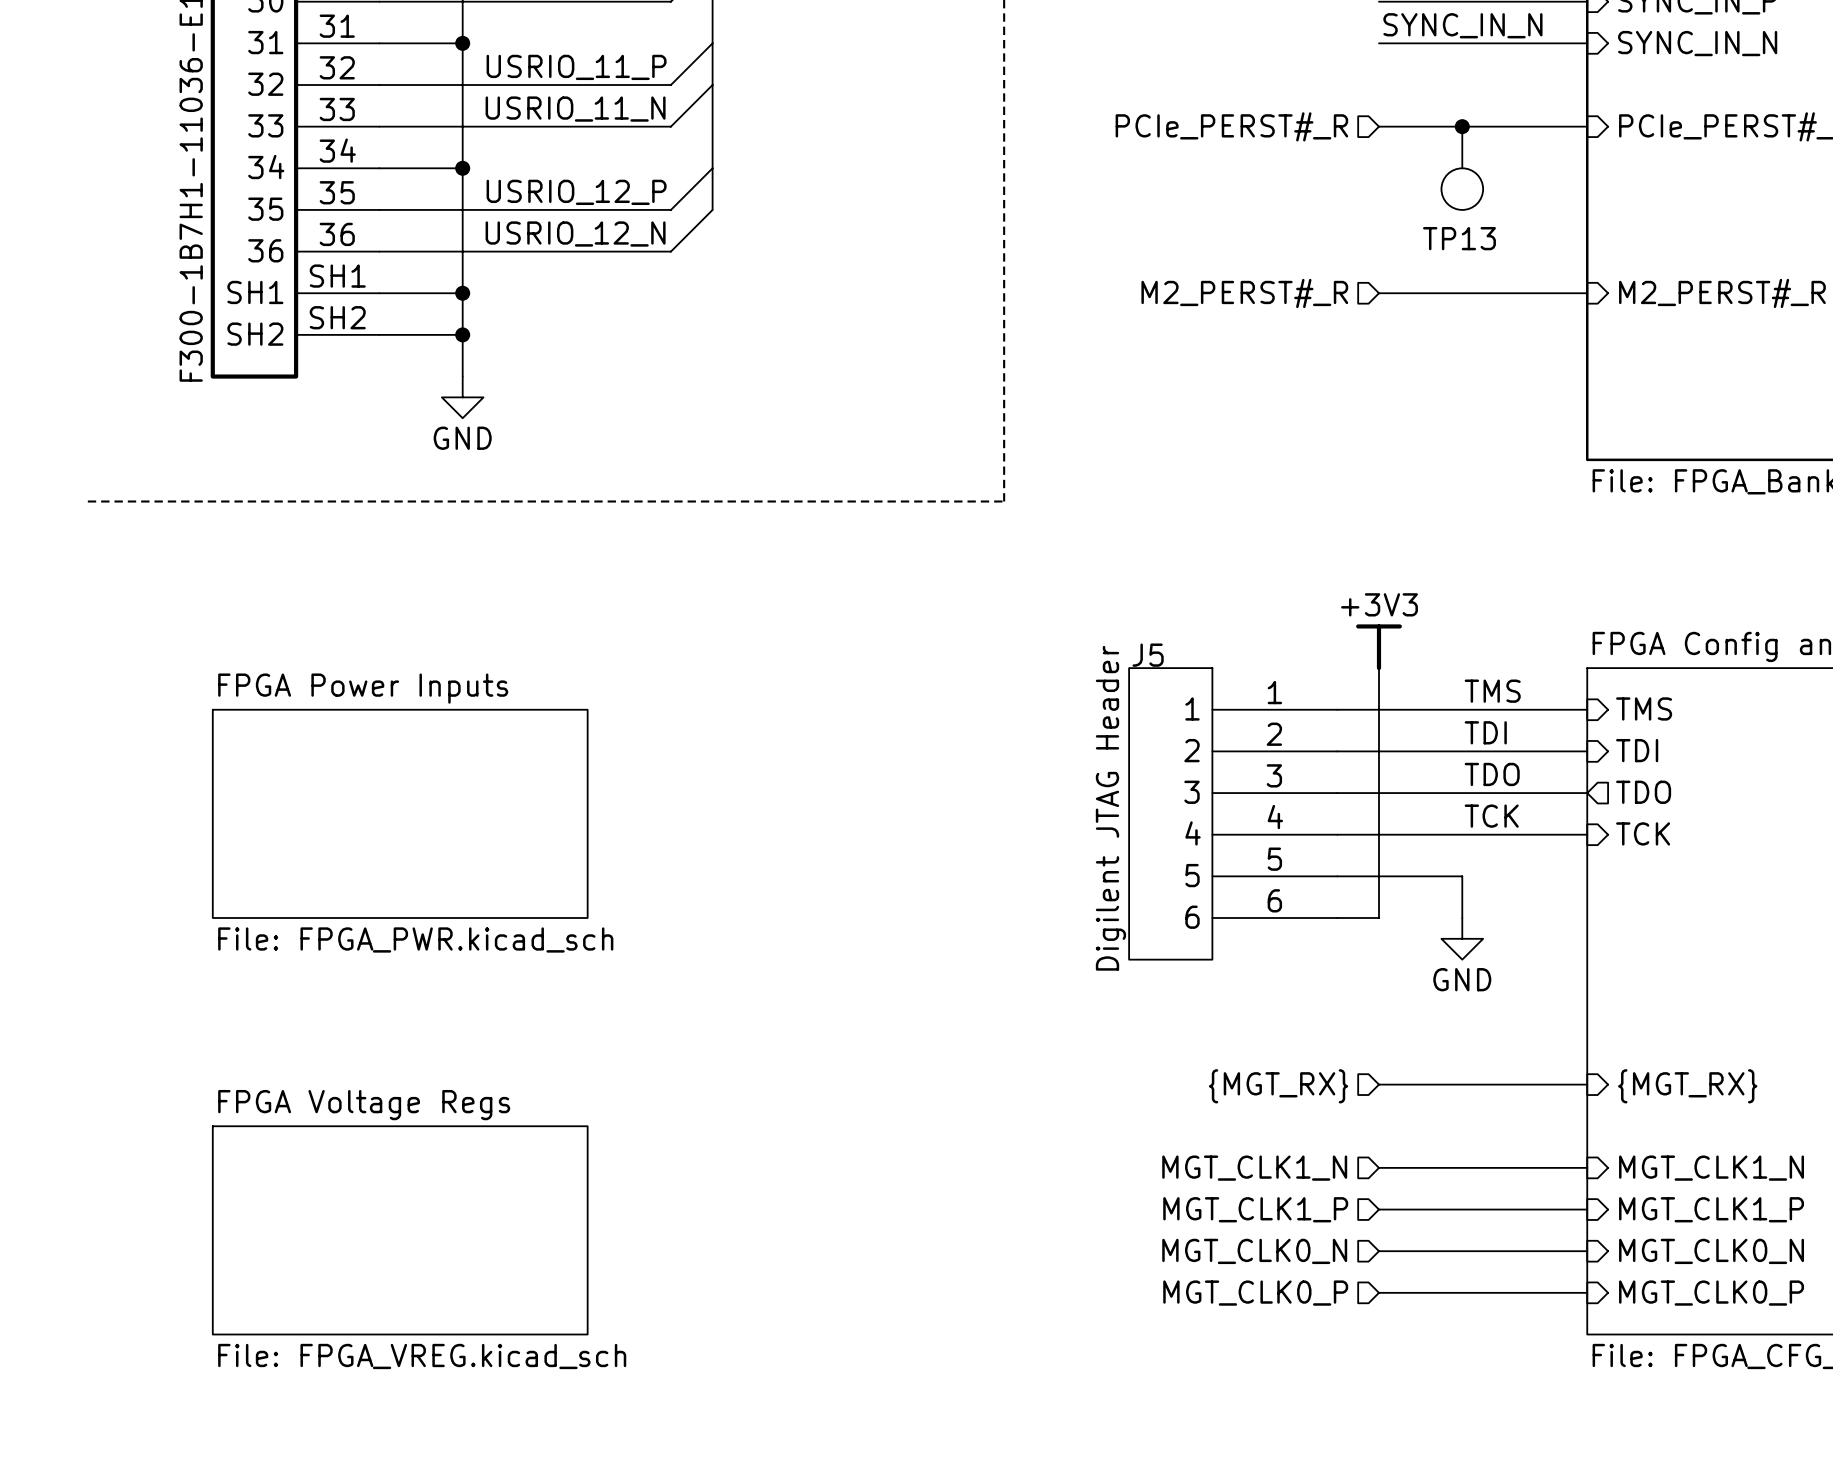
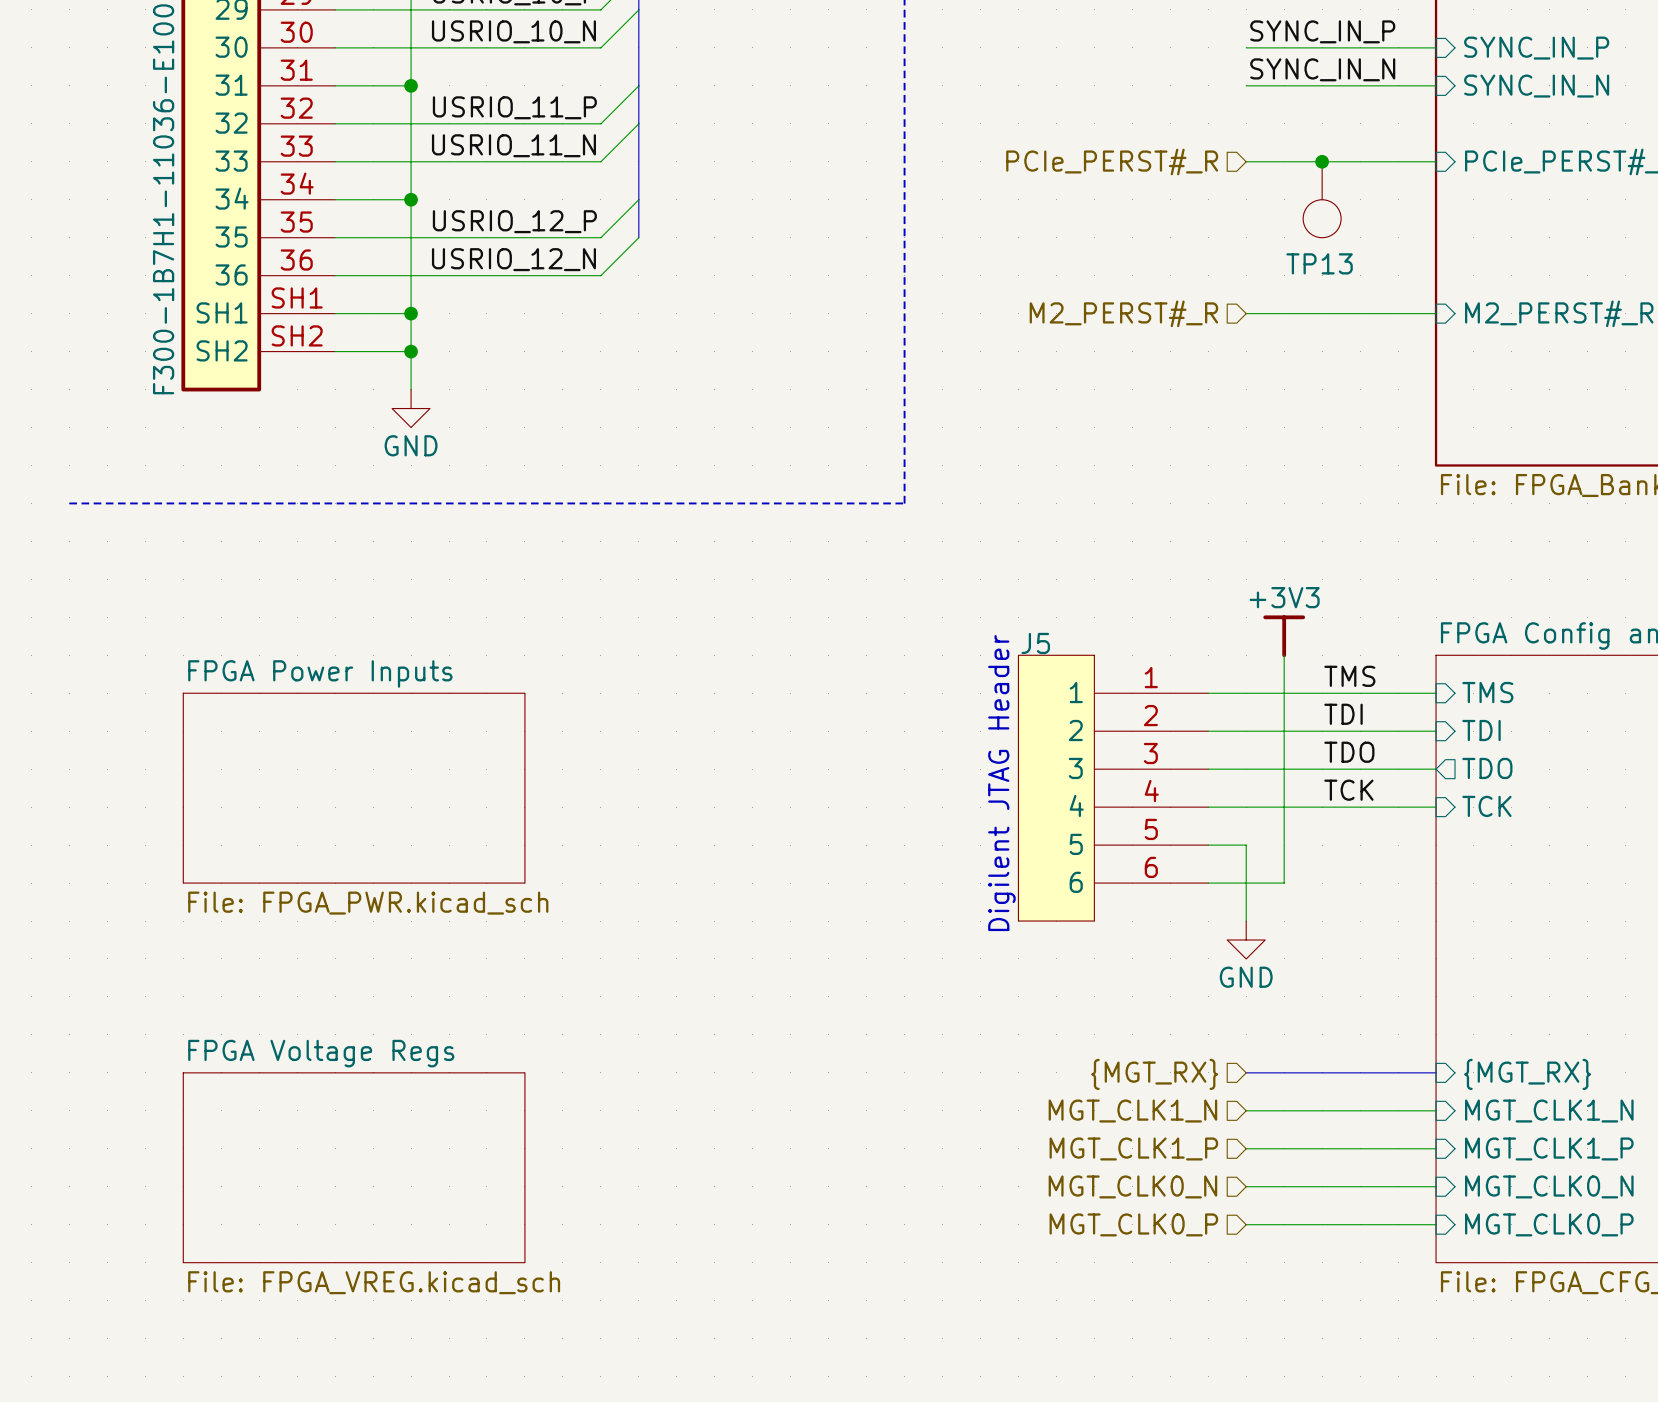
power symbol position: +3V3 (1378, 647) -> +3V3 (1284, 636)
wire: (1378, 668) (1378, 876) (1462, 876) (1462, 918) -> none
wire: none -> (1284, 655) (1284, 883) (1246, 883) (1246, 921)
power symbol position: GND (1462, 938) -> GND (1246, 940)
bus: (1378, 1084) (1587, 1084) -> (1246, 1072) (1436, 1072)
hierarchical label position: {MGT_RX} (1278, 1086) -> {MGT_RX} (1154, 1074)
sheet pin position: {MGT_RX} (1687, 1086) -> {MGT_RX} (1527, 1074)

